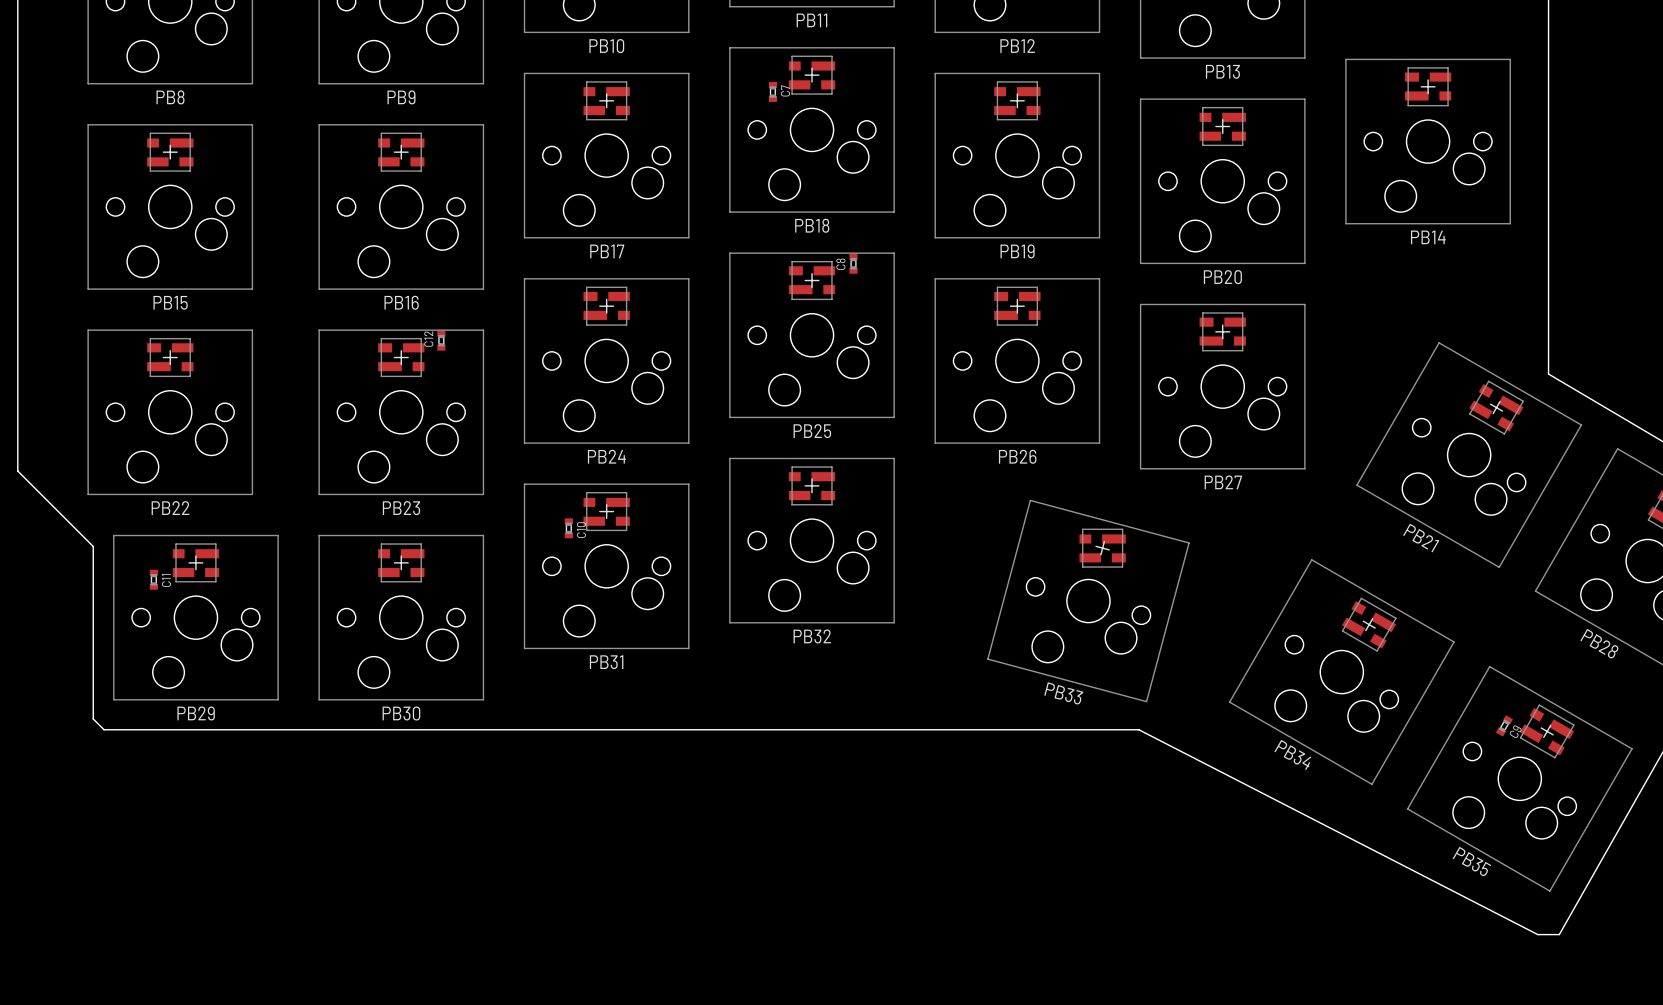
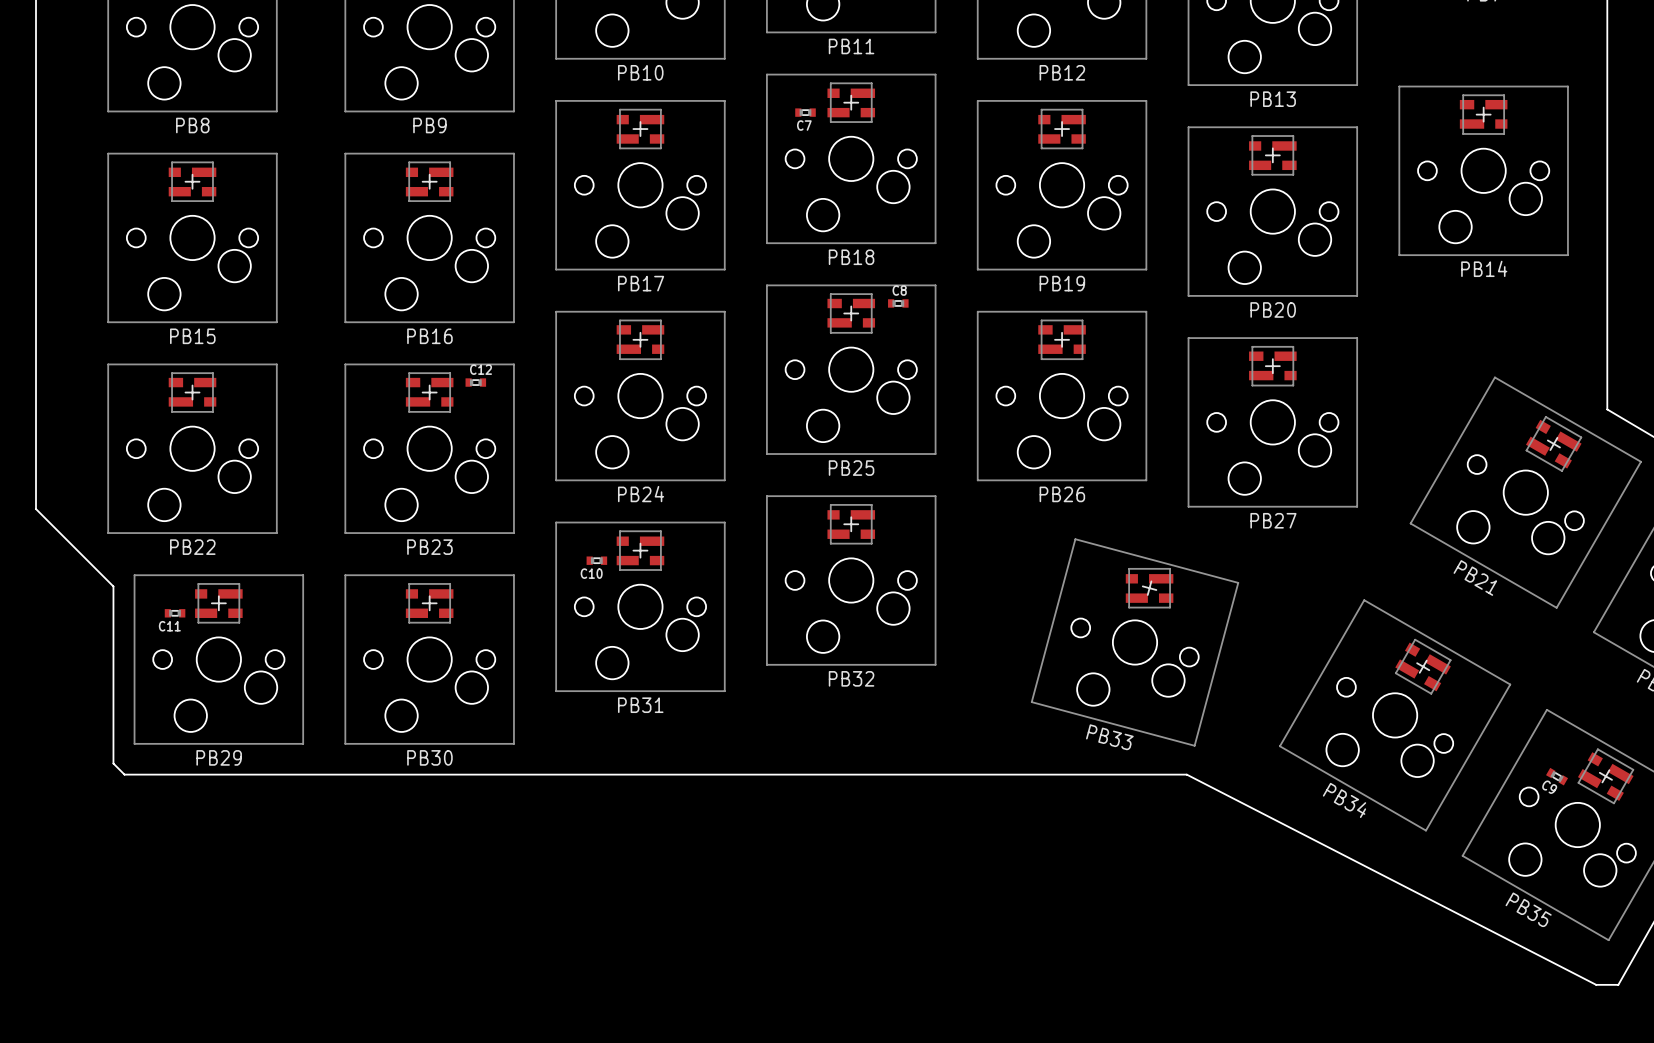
C7 rotation: 0° (772, 91) -> 90° clockwise (805, 112)
C8 rotation: 0° (853, 263) -> 90° clockwise (898, 303)
C12 rotation: 0° (441, 340) -> 90° clockwise (475, 382)
C10 rotation: 0° (568, 528) -> 90° clockwise (596, 560)
C11 rotation: 0° (153, 579) -> 90° clockwise (175, 613)
C9 rotation: 0° (1504, 725) -> 90° clockwise (1557, 776)

